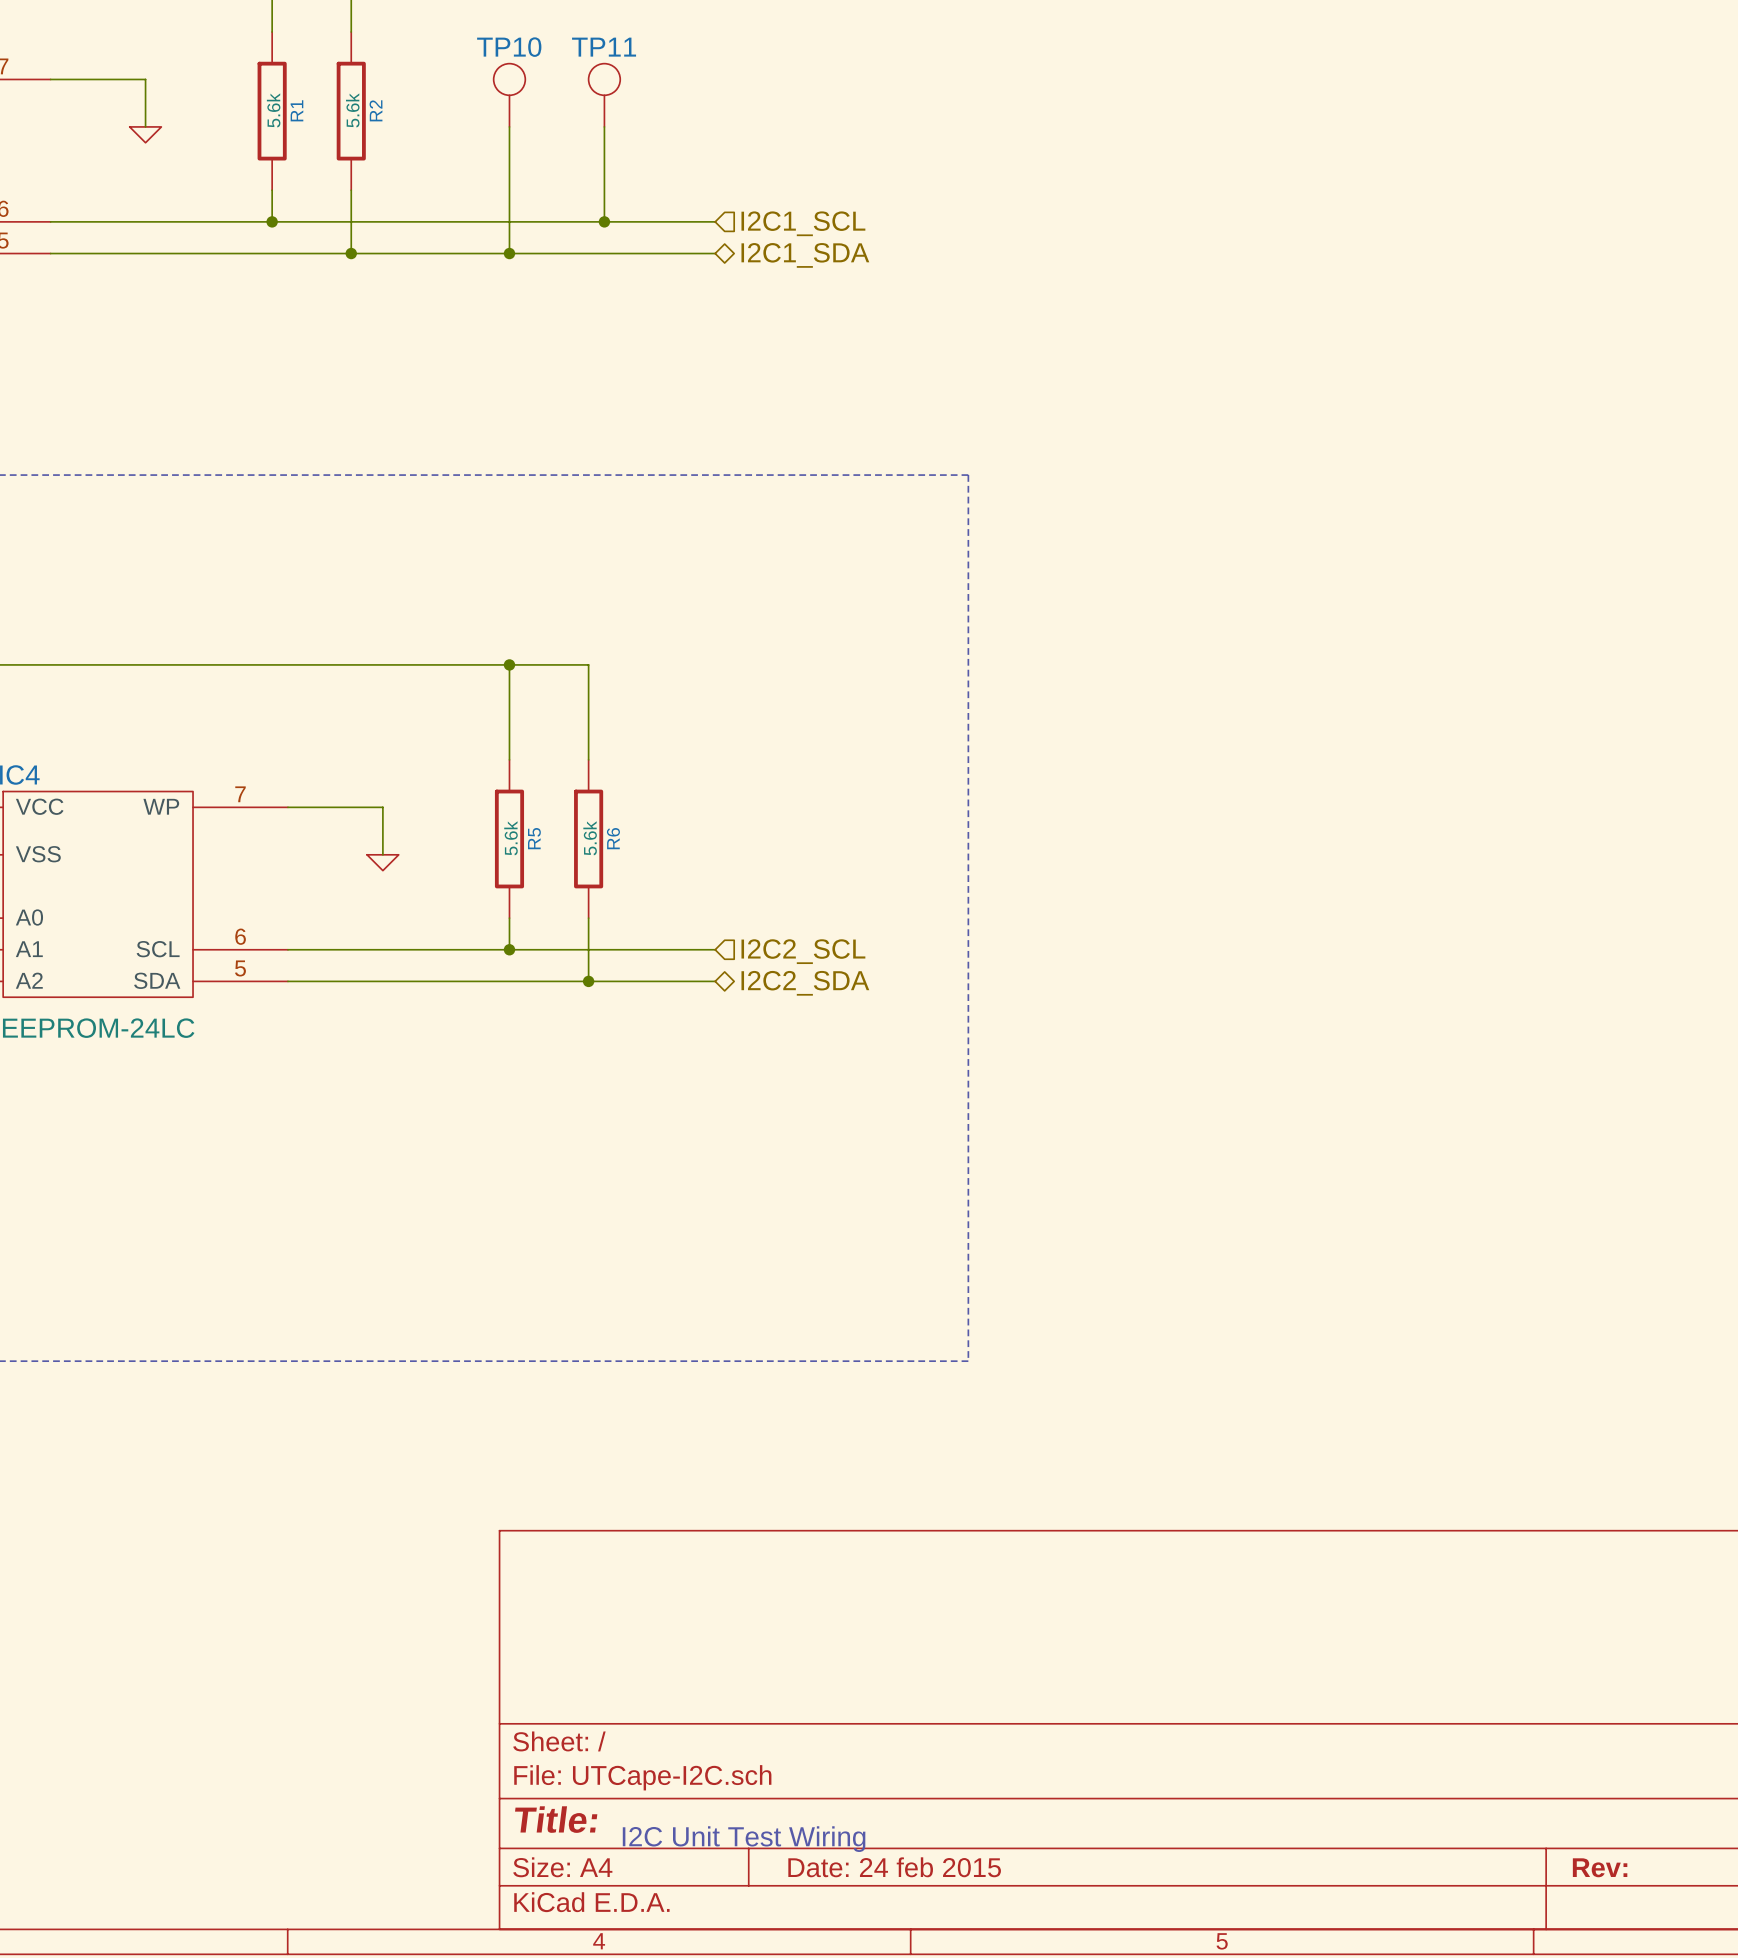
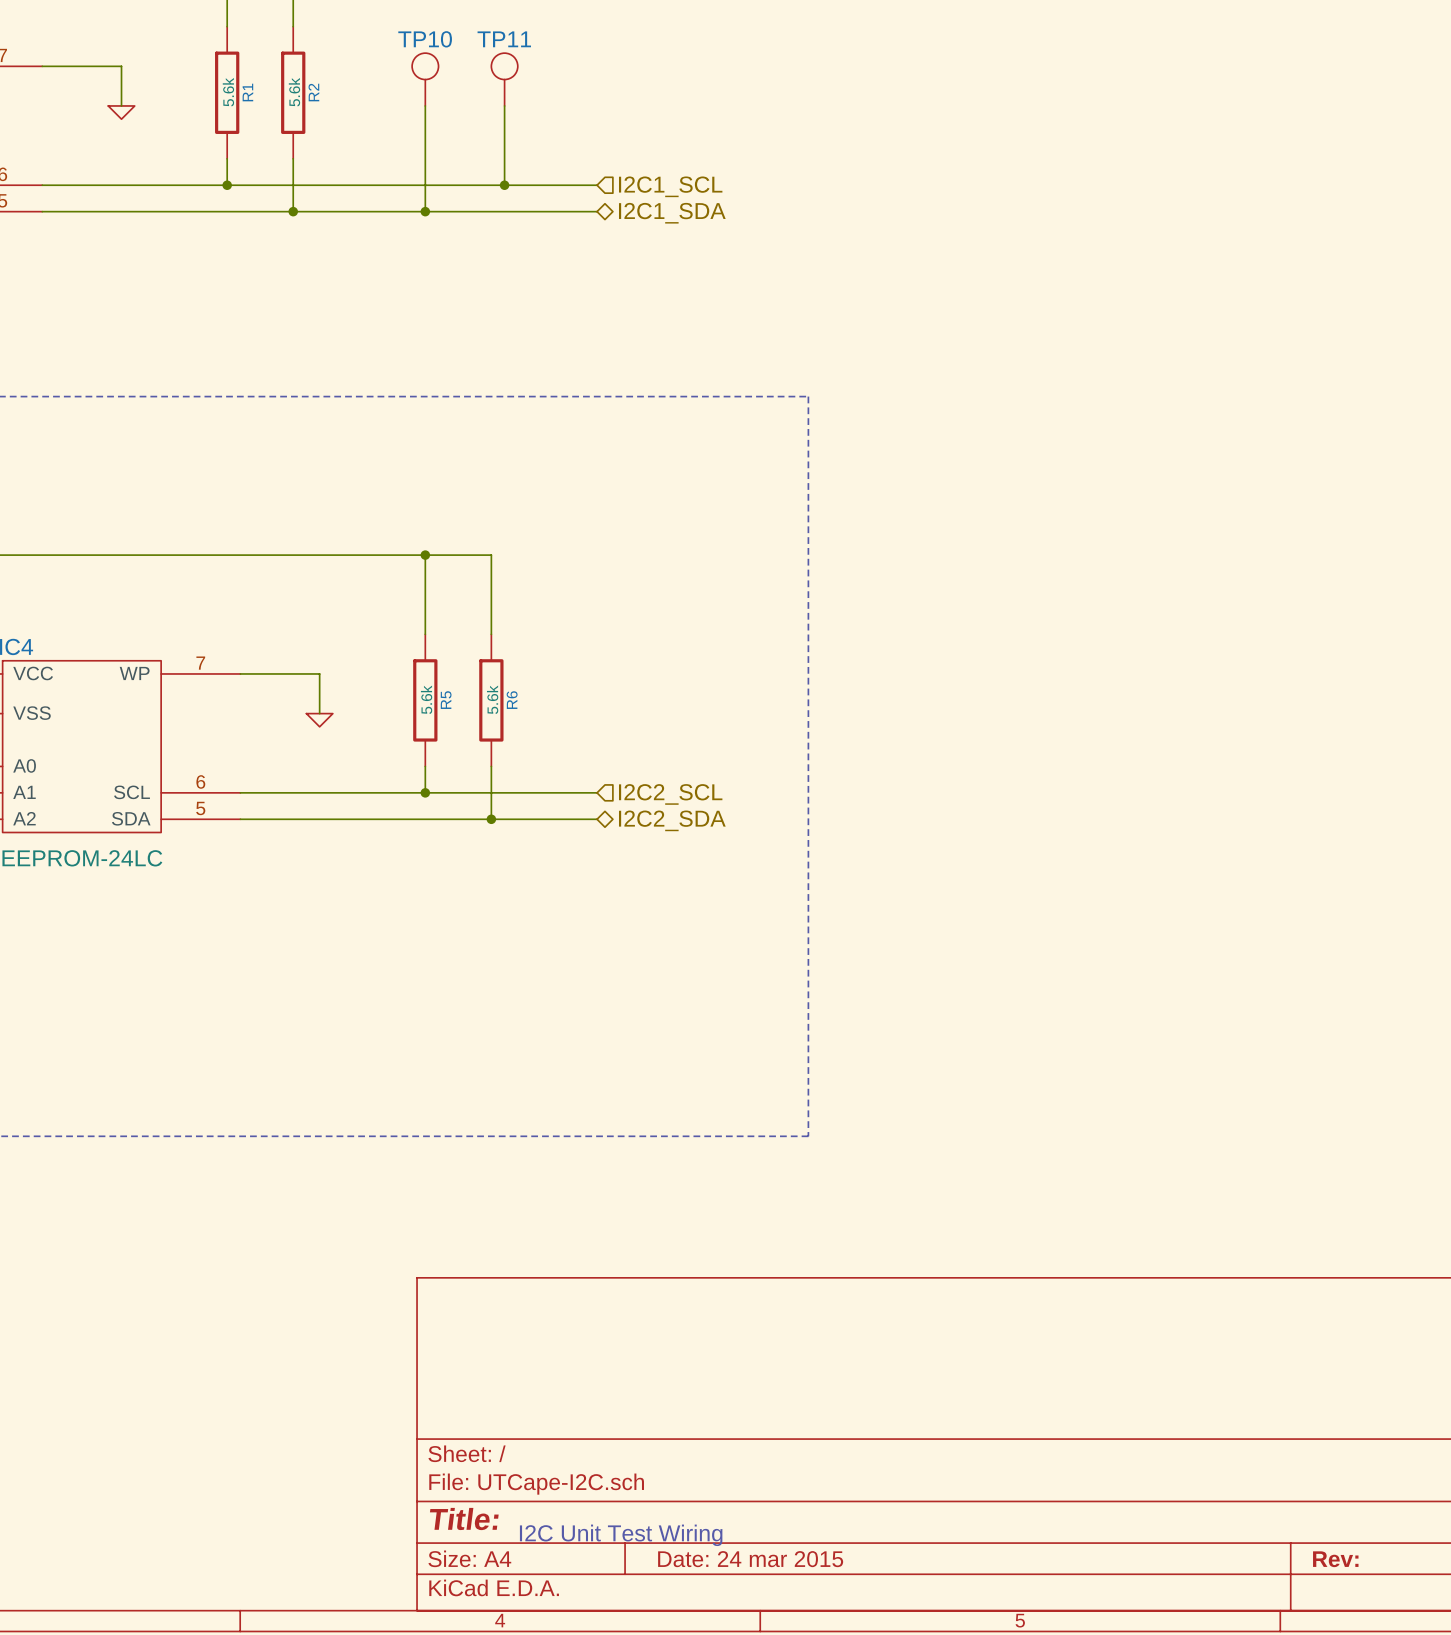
title block: Date: 24 feb 2015 (894, 1867) -> Date: 24 mar 2015 (750, 1559)

